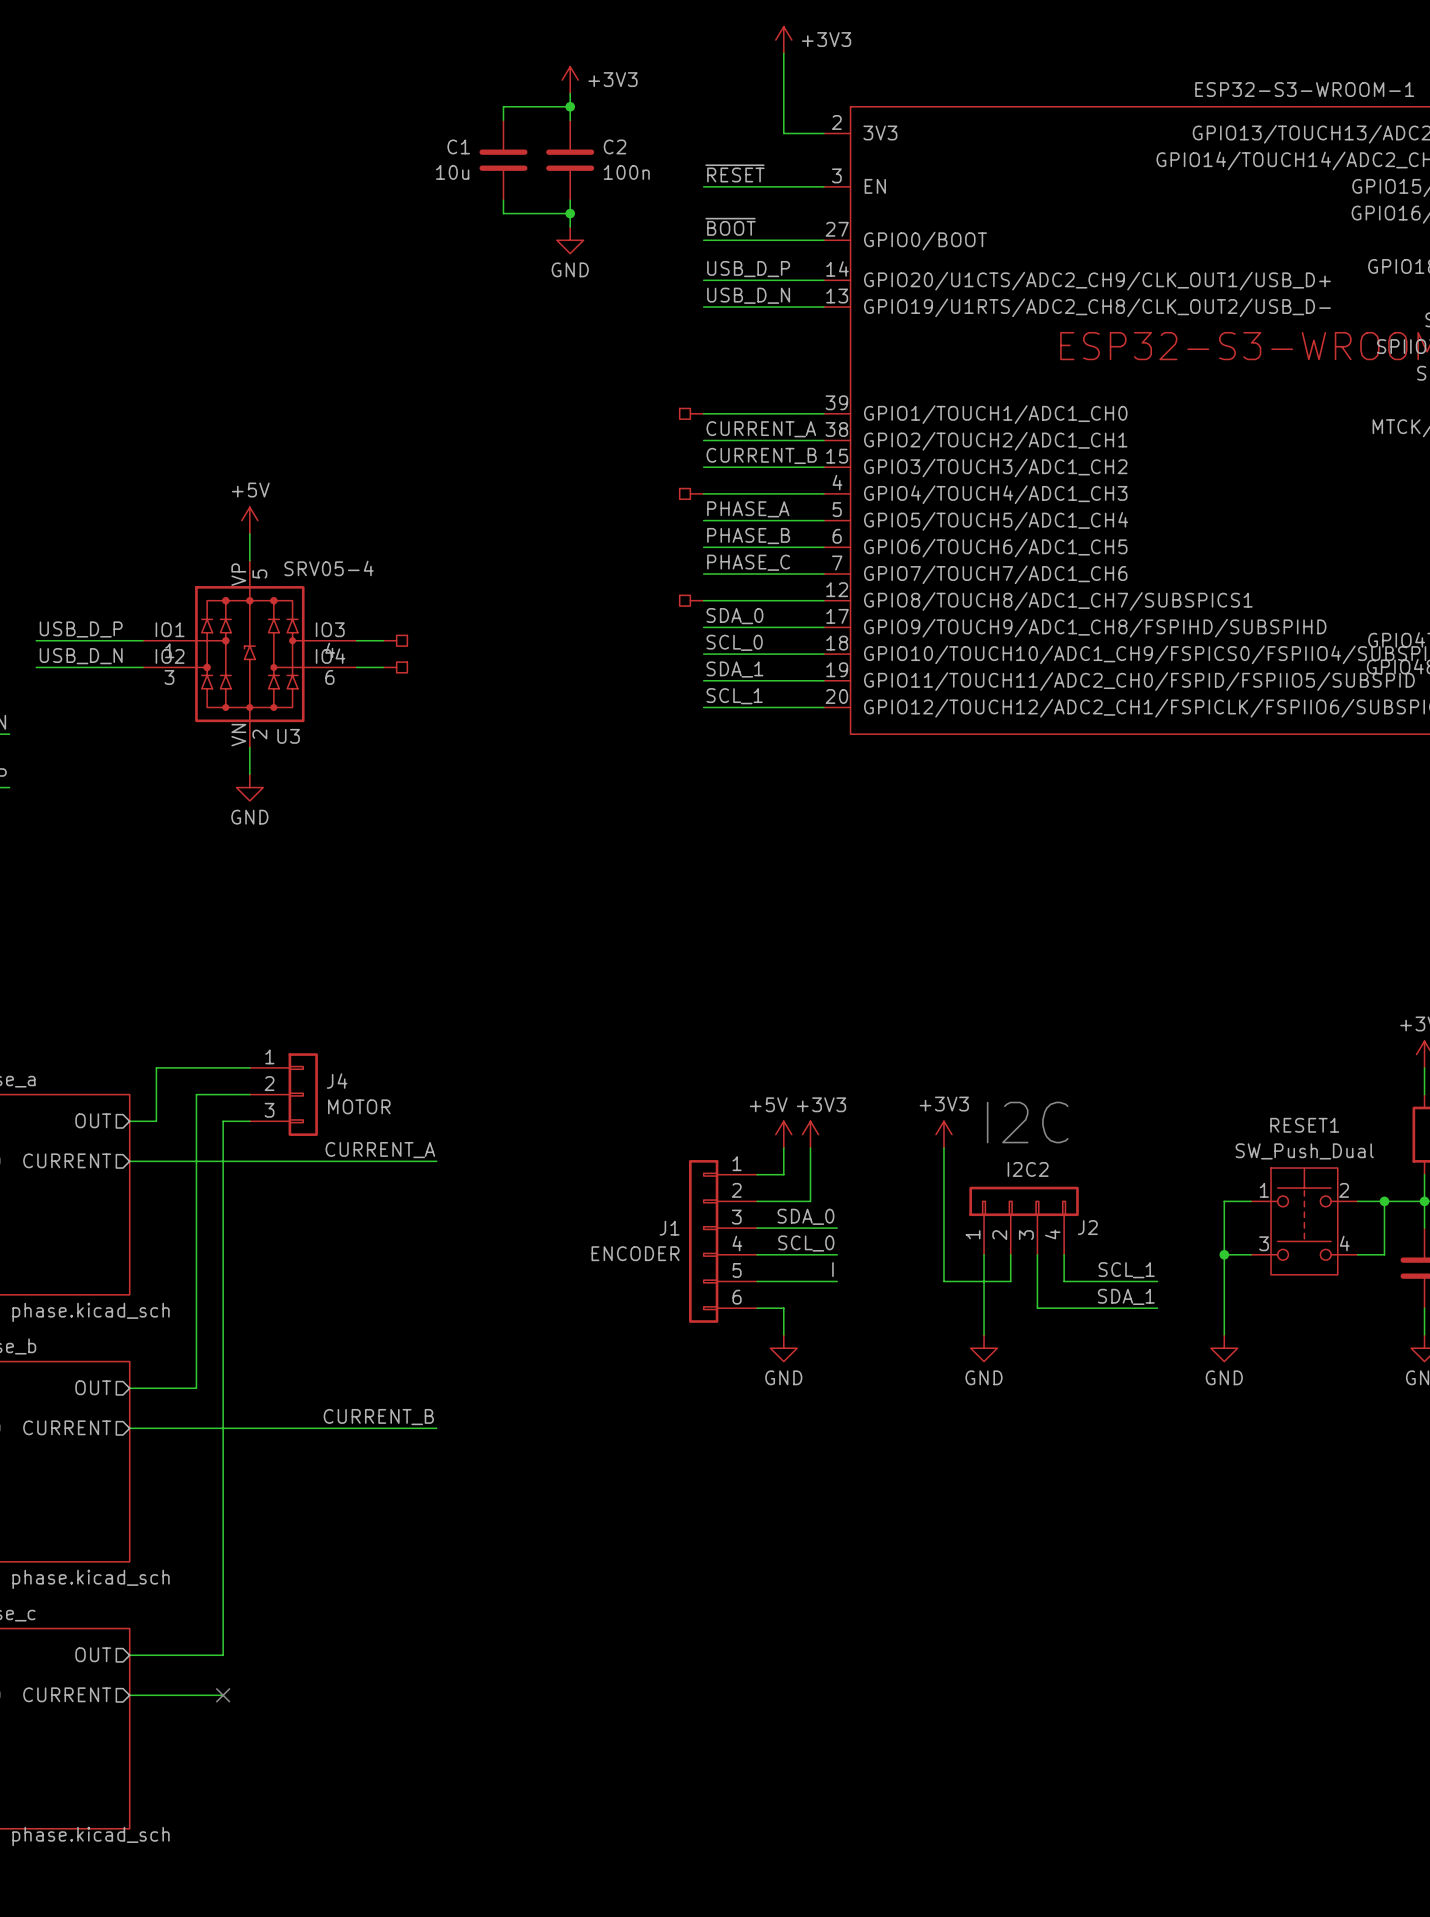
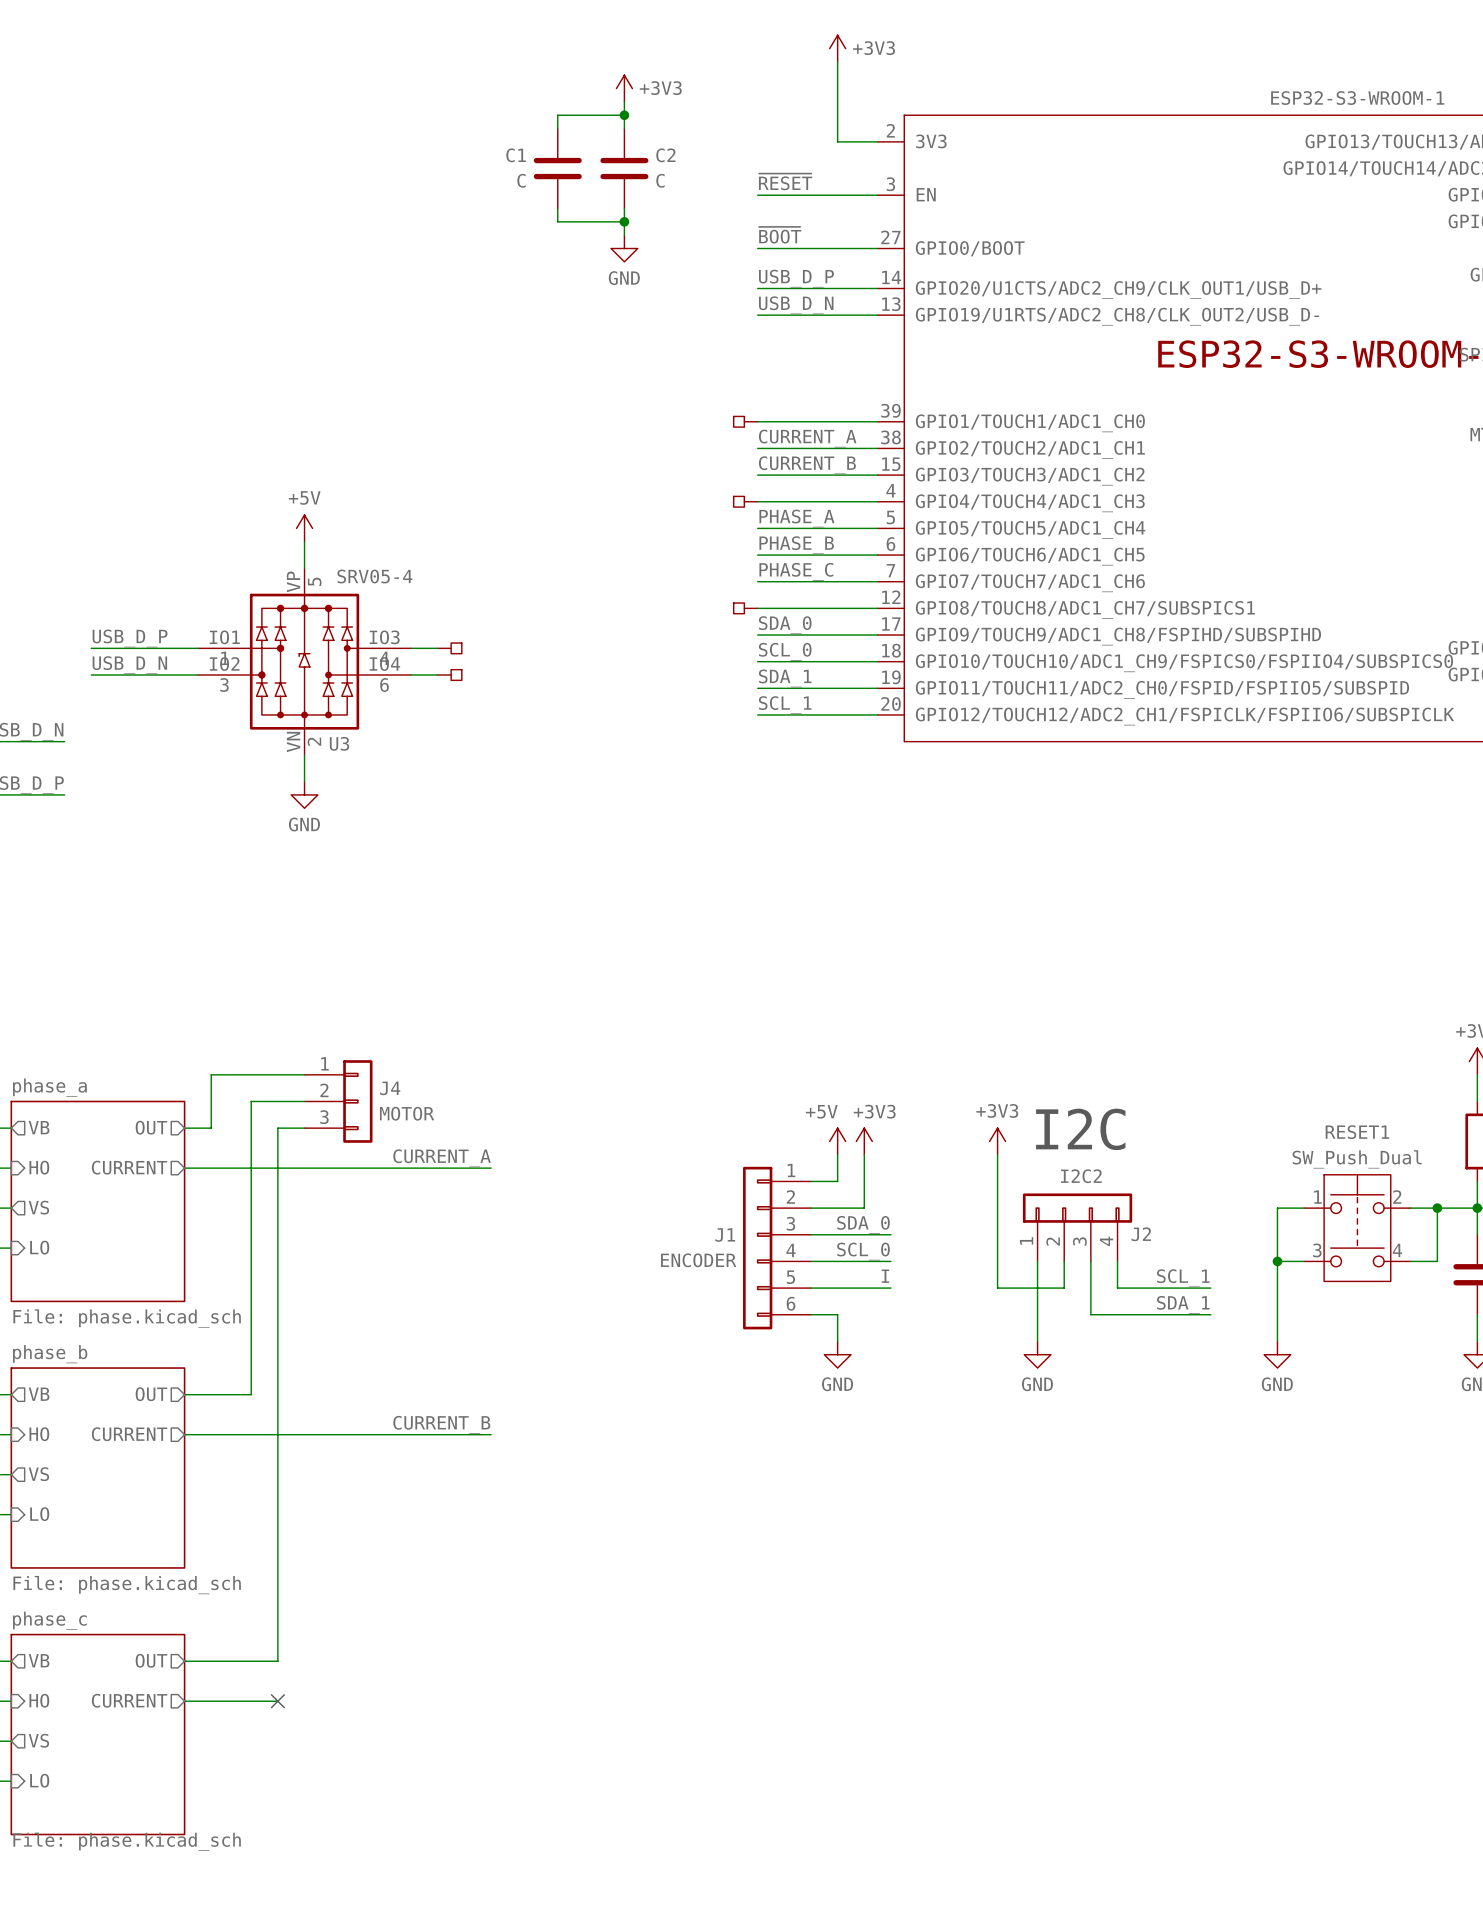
C1 value: 10u (452, 172) -> C (521, 180)
C2 value: 100n (626, 172) -> C (660, 180)

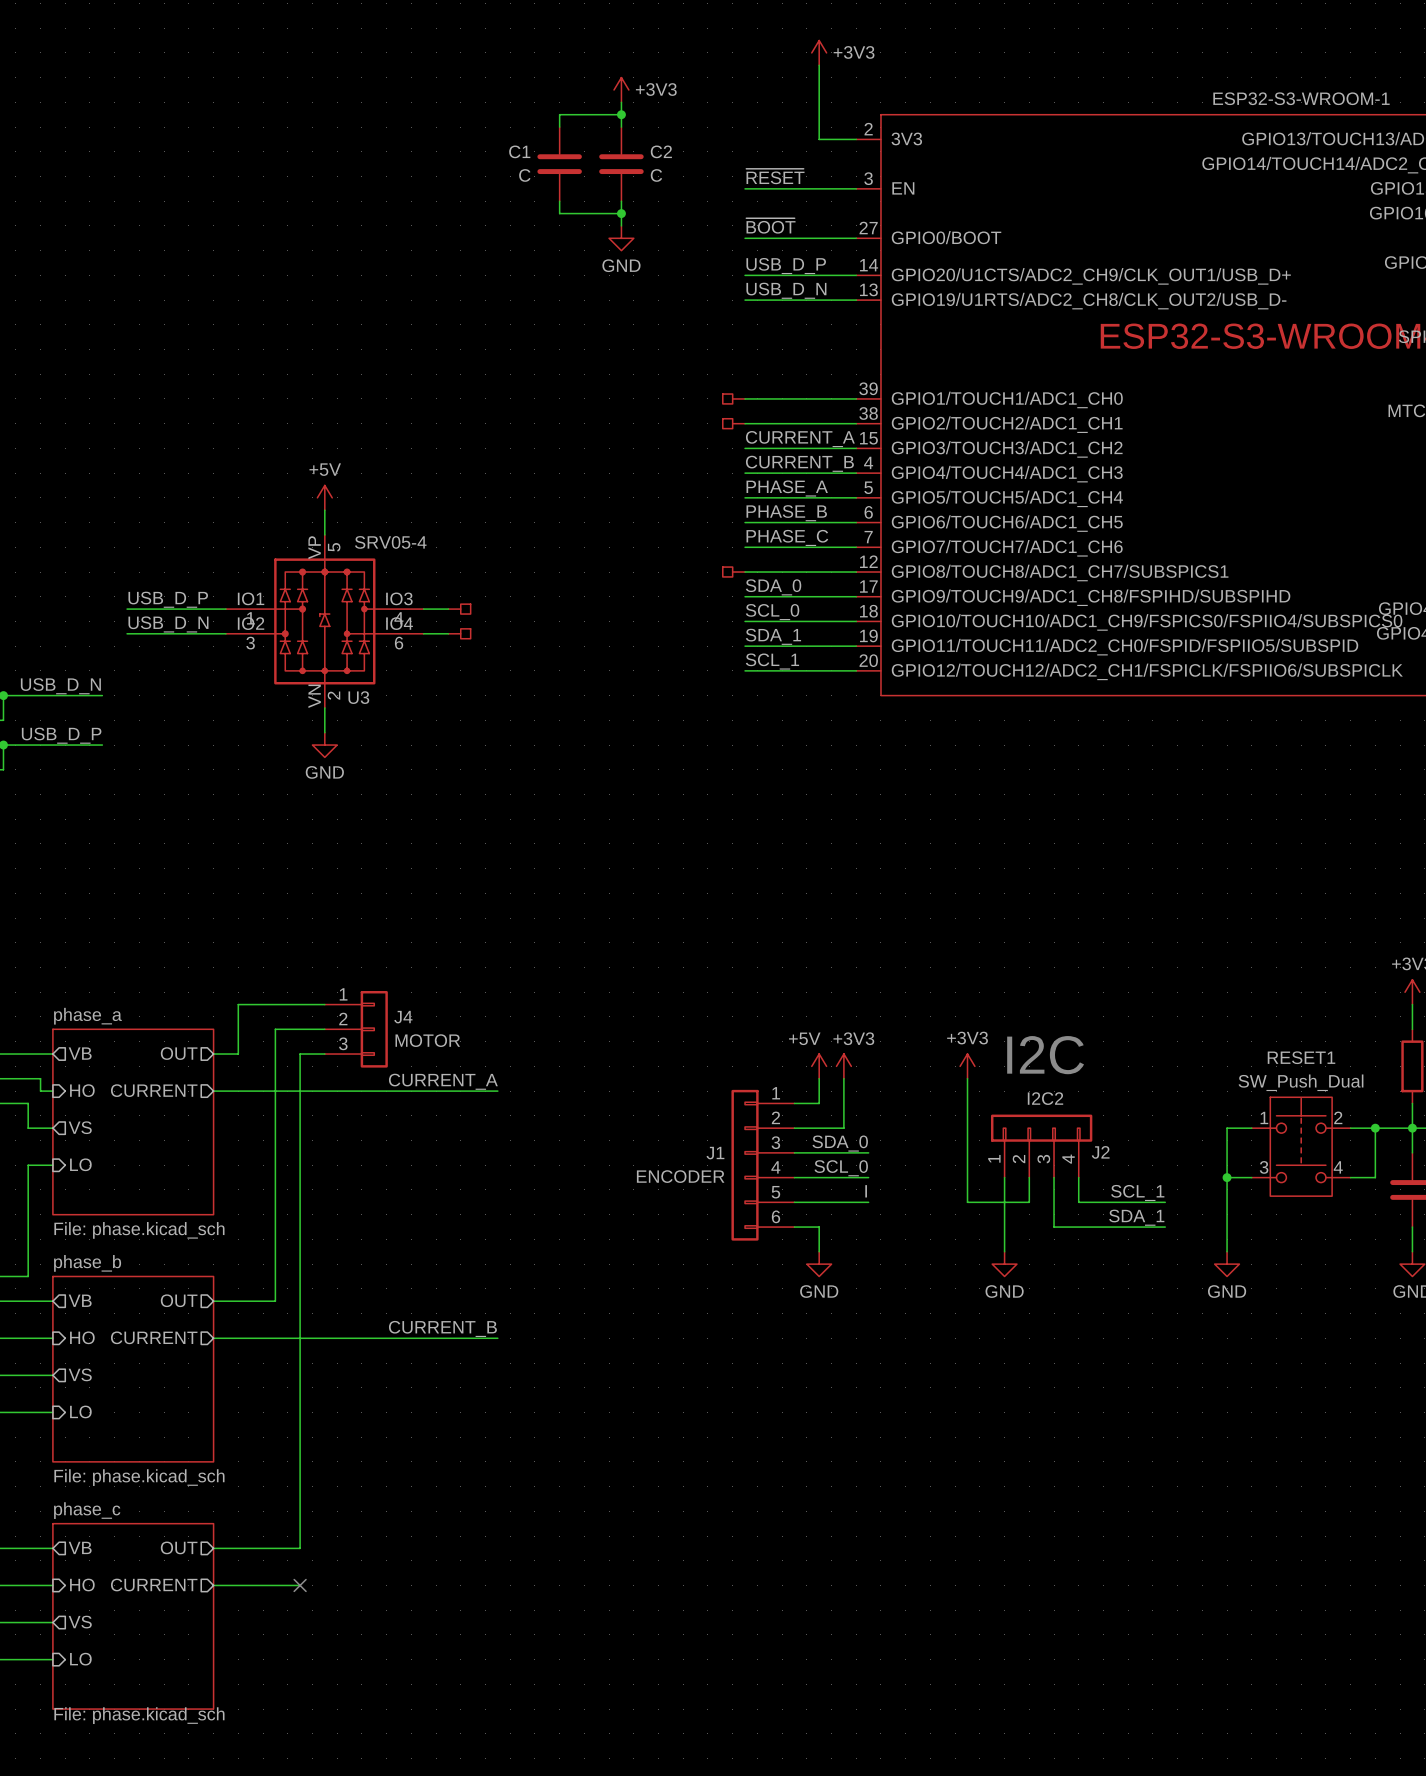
label: CURRENT_A (807, 438) -> none
label: CURRENT_B (807, 465) -> CURRENT_A (800, 439)
label: none -> CURRENT_B (799, 463)
part position: (745, 501) -> (733, 423)

